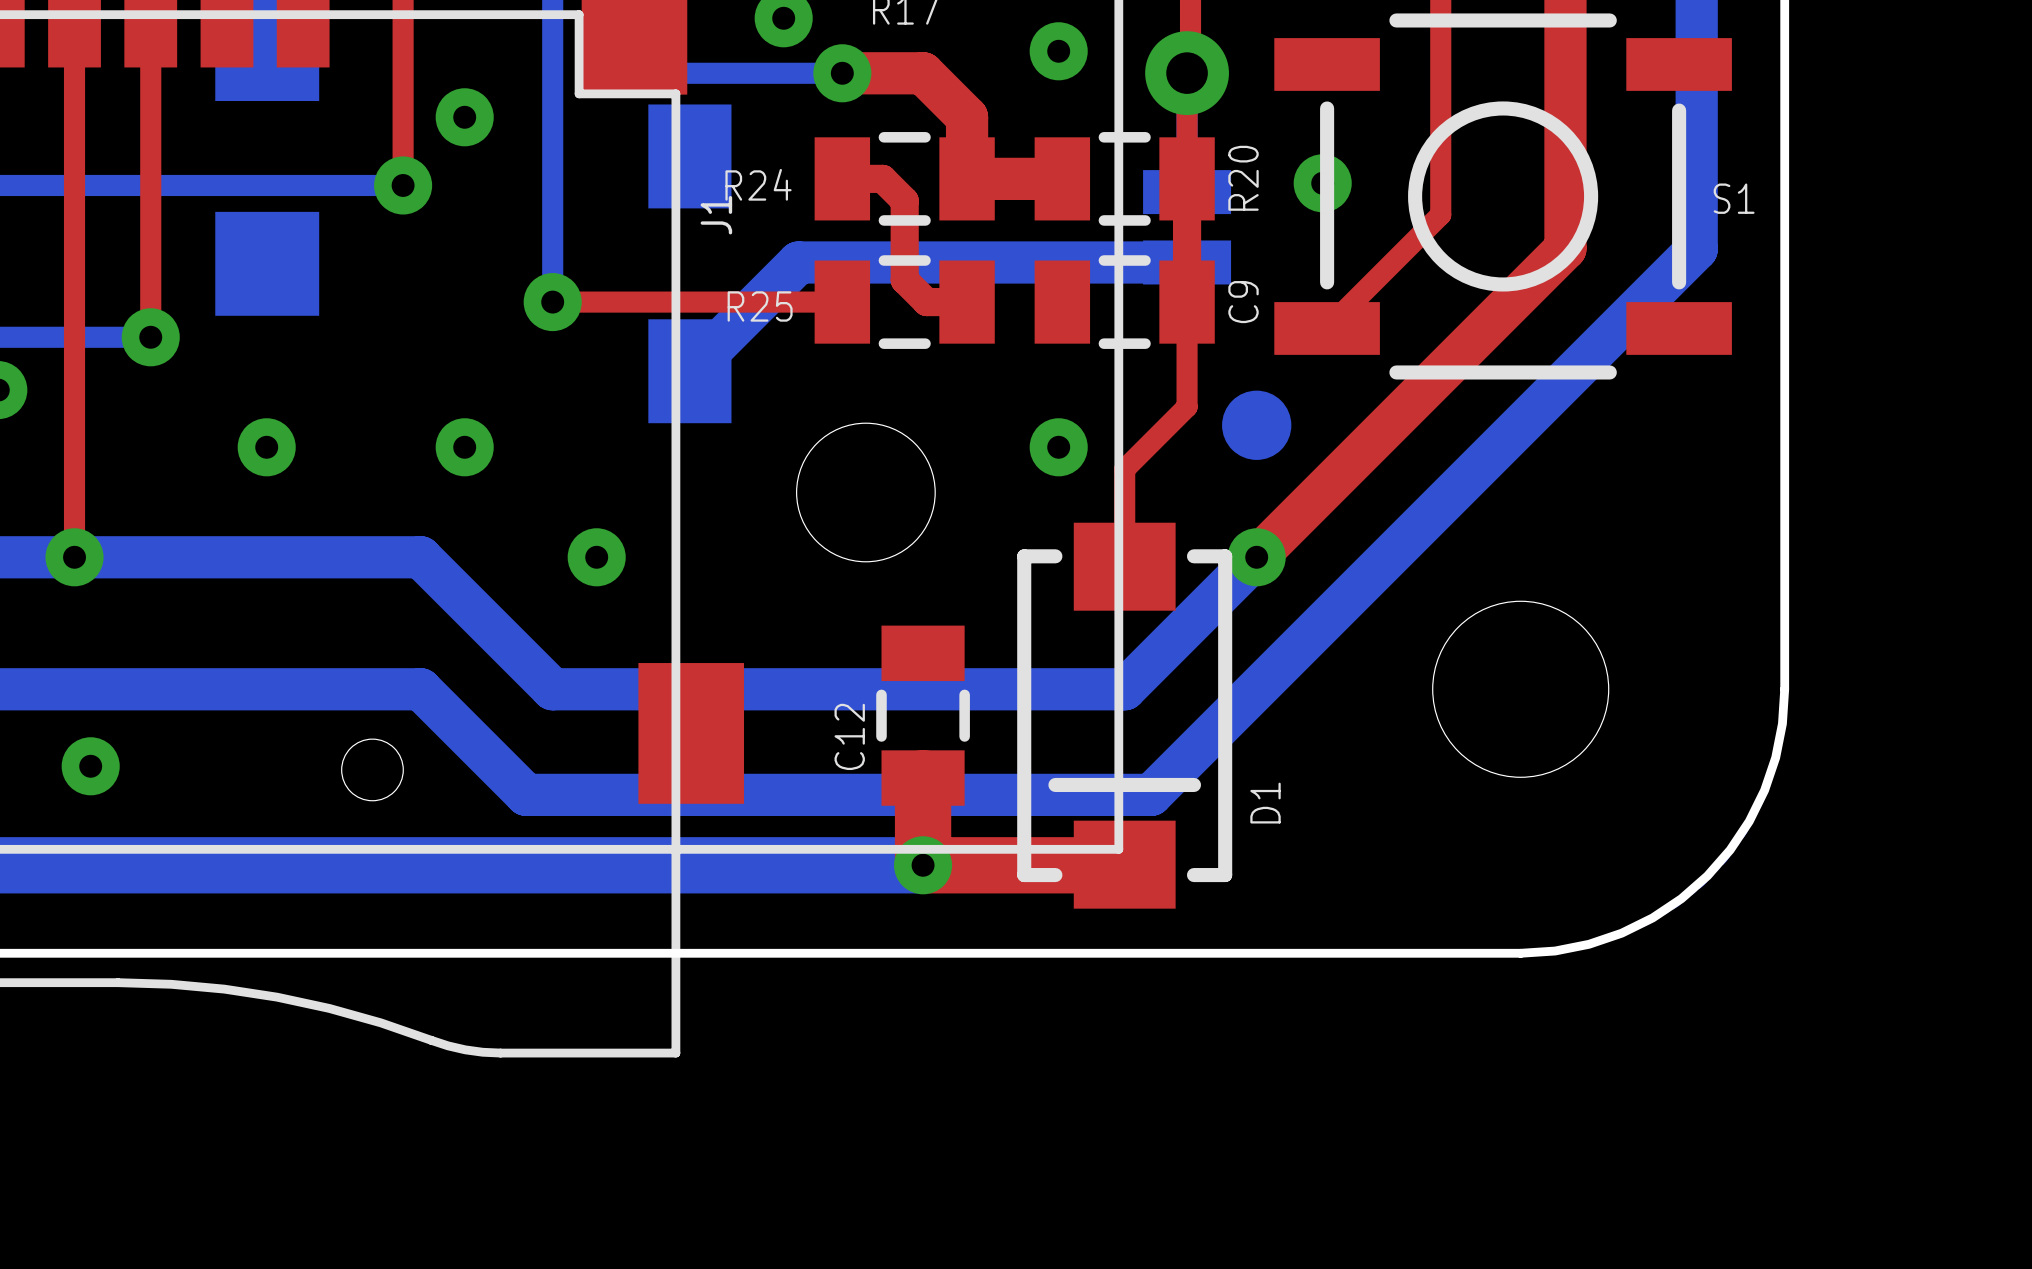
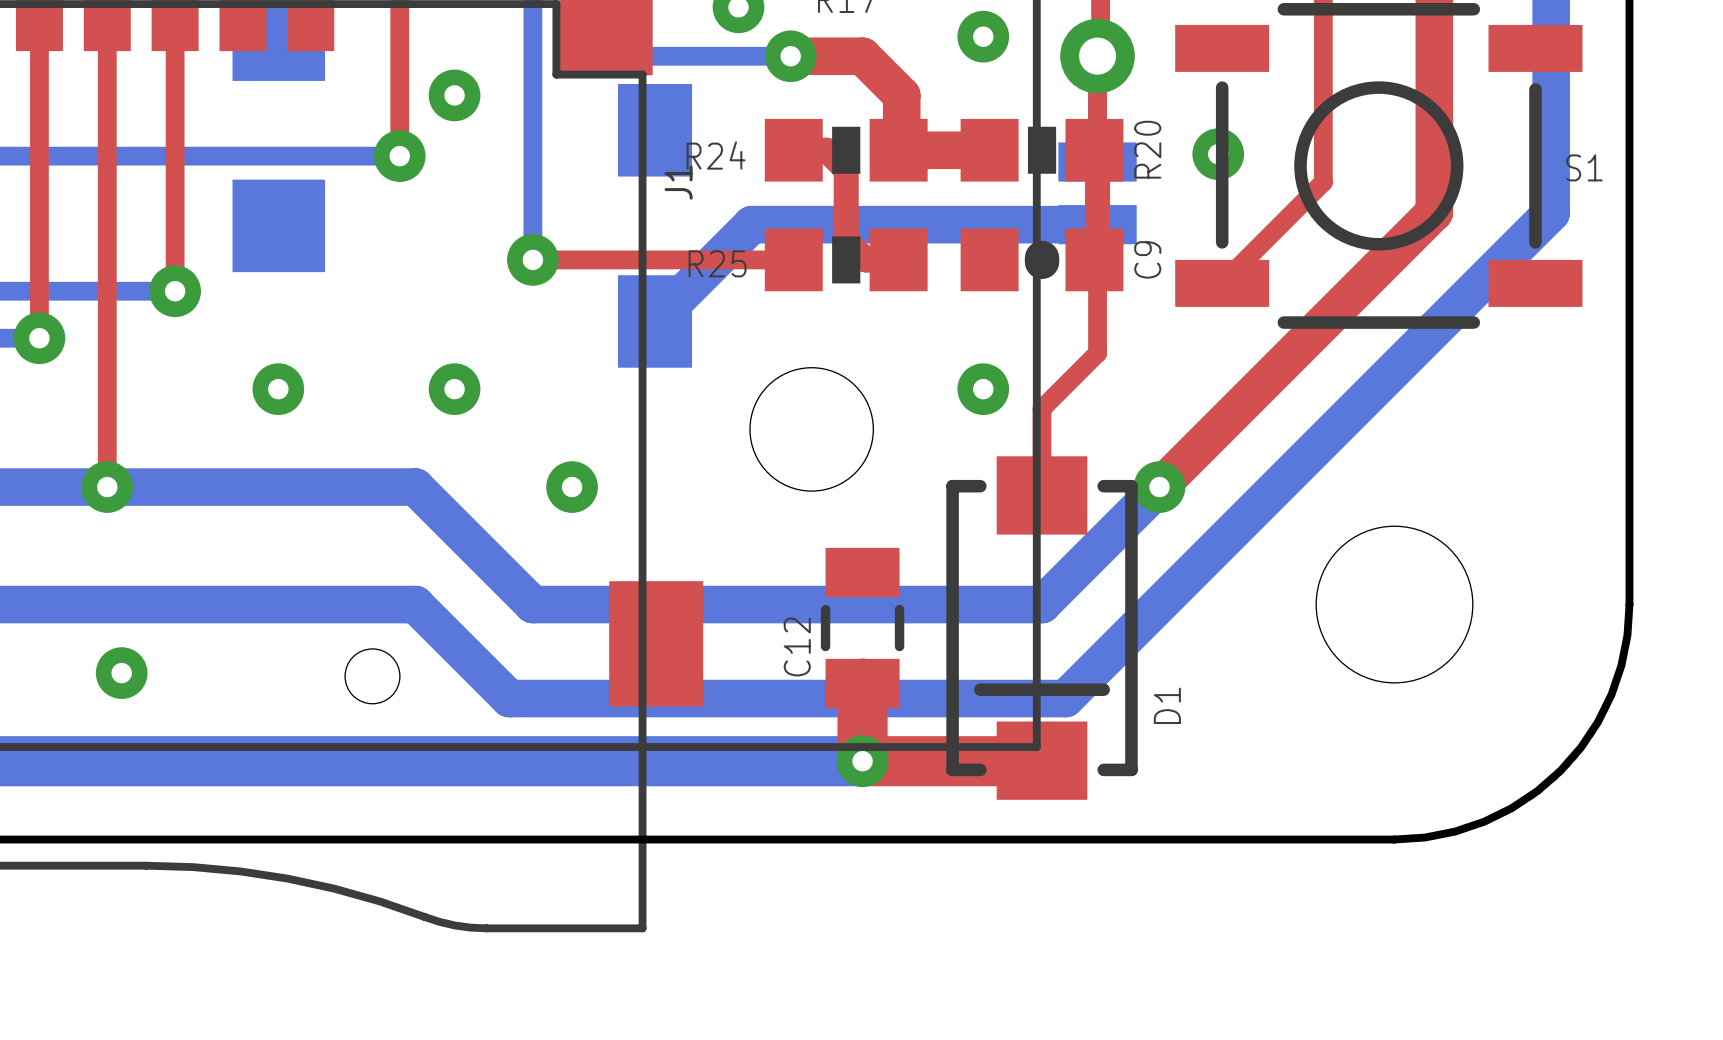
R24 footprint: [814, 132, 995, 226] -> [764, 118, 928, 182]
R20 footprint: [1034, 132, 1215, 226] -> [960, 118, 1124, 182]
R25 footprint: [814, 255, 995, 349] -> [764, 228, 928, 292]
C9 footprint: [1034, 255, 1215, 349] -> [960, 228, 1124, 292]
part: (1256, 425) -> none

